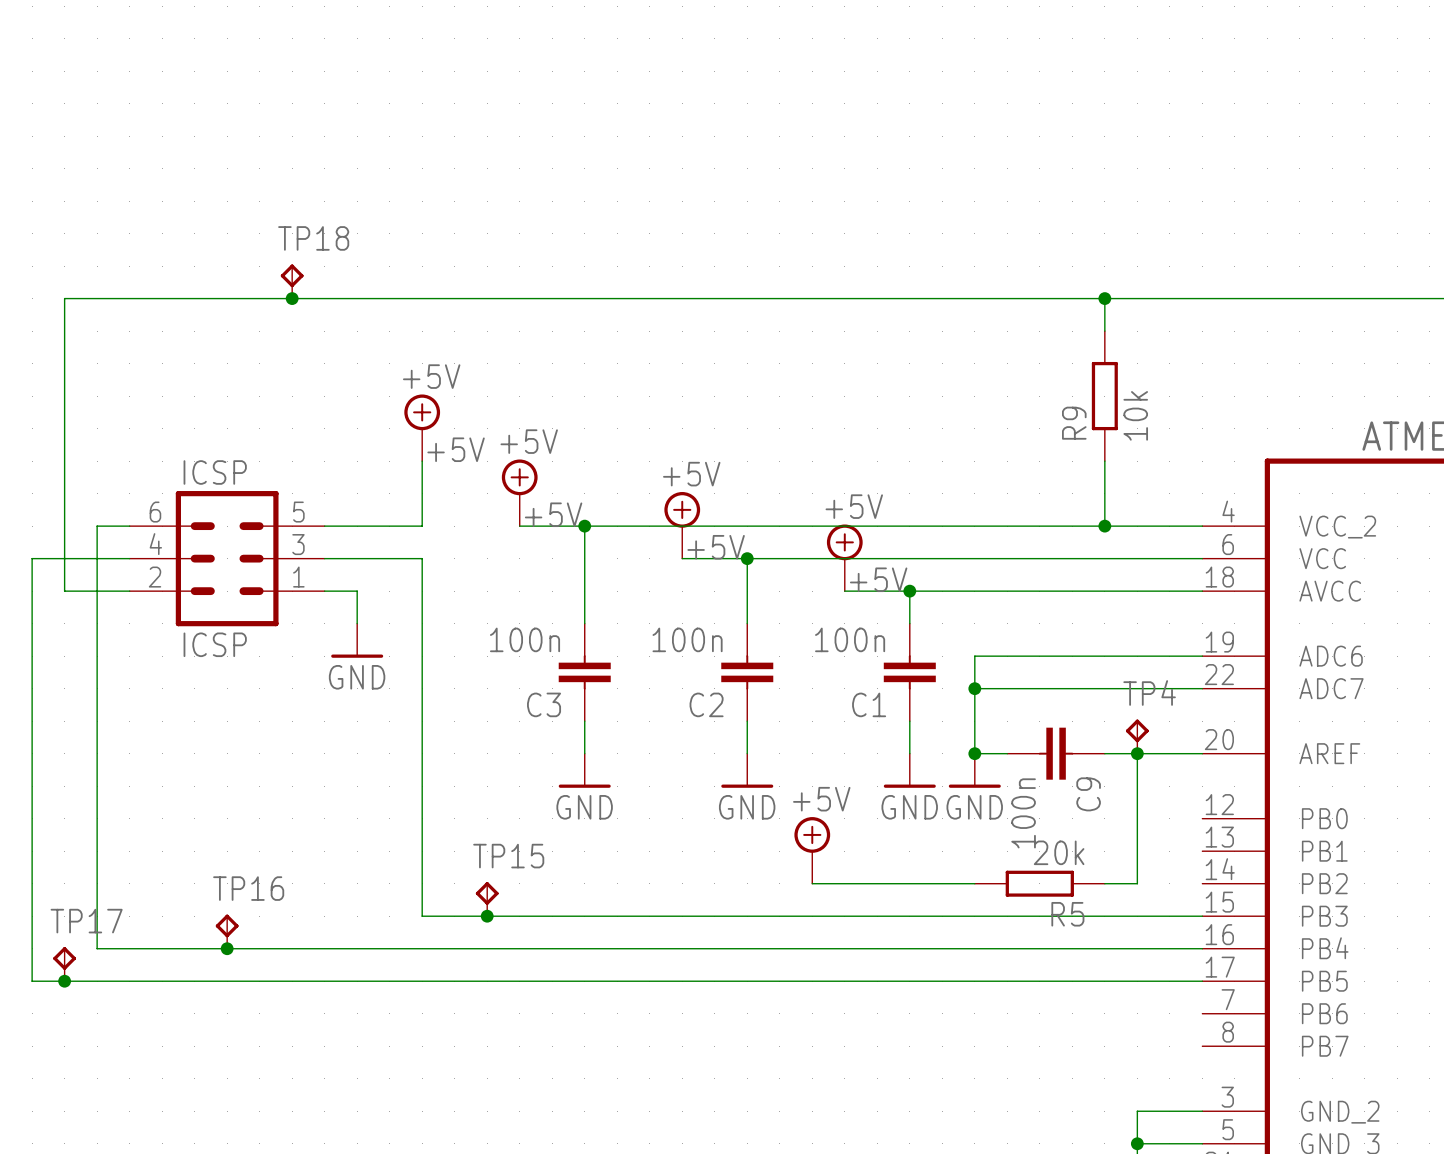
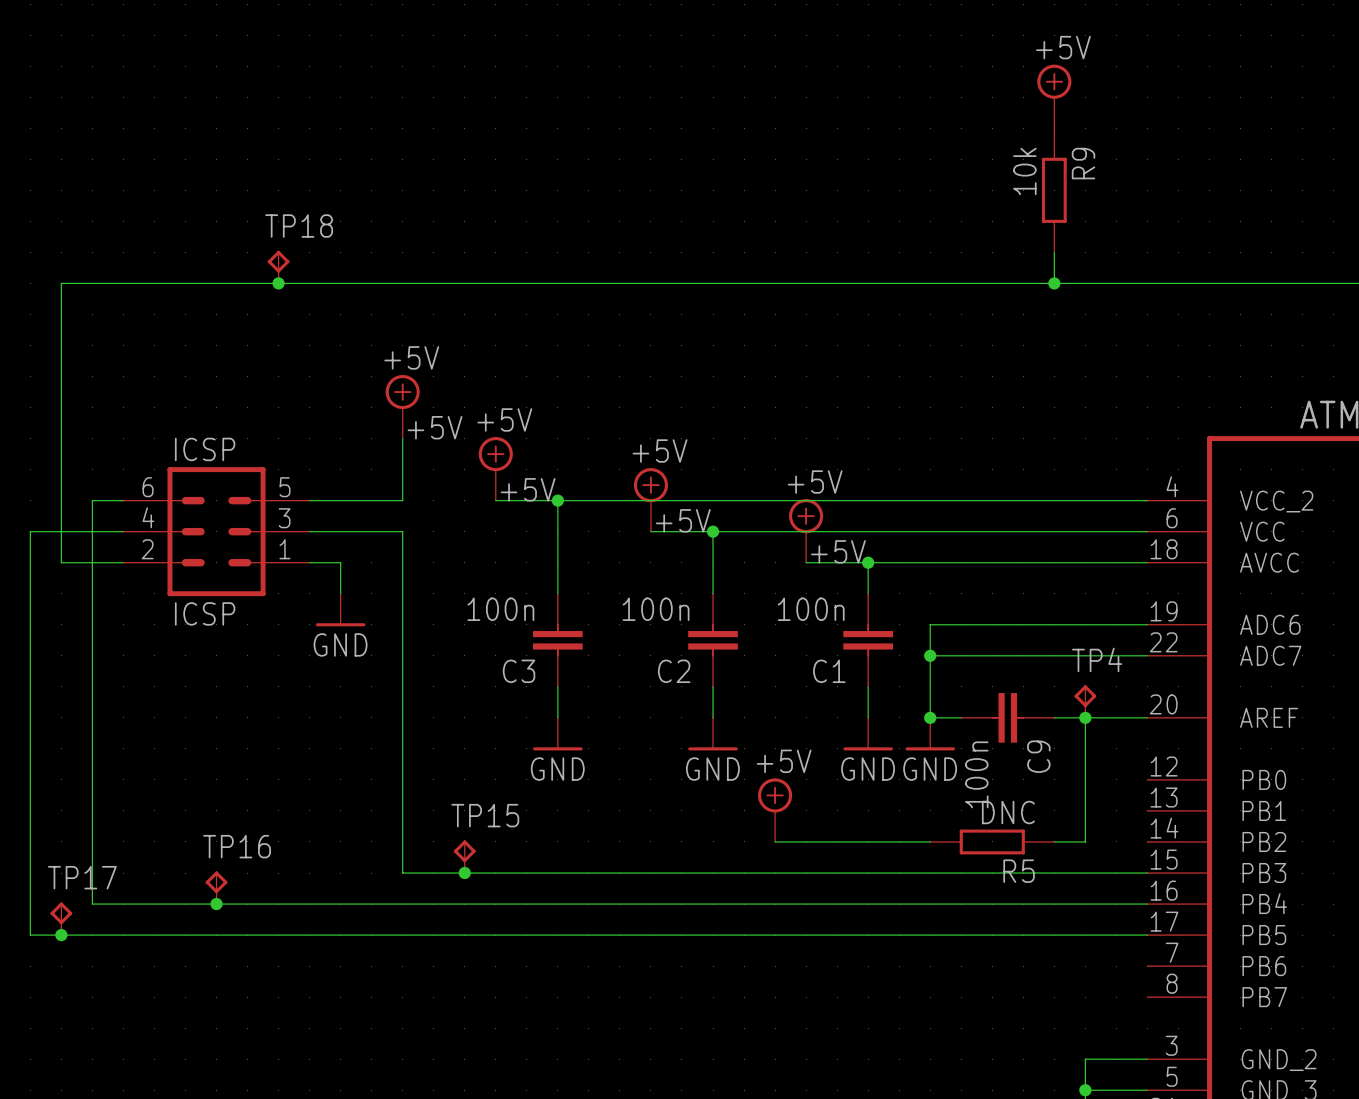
power symbol: none -> +5V (1054, 96)
wire: (1104, 298) (1104, 331) -> (1054, 283) (1054, 252)
R9 position: (1104, 396) -> (1054, 190)
R9 value position: 10k (1135, 415) -> 10k (1024, 171)
R9 name position: R9 (1074, 423) -> R9 (1083, 163)
wire: (1104, 461) (1104, 526) -> none
junction: (1104, 526) -> none
R5 value: 20k (1059, 852) -> DNC (1008, 812)

